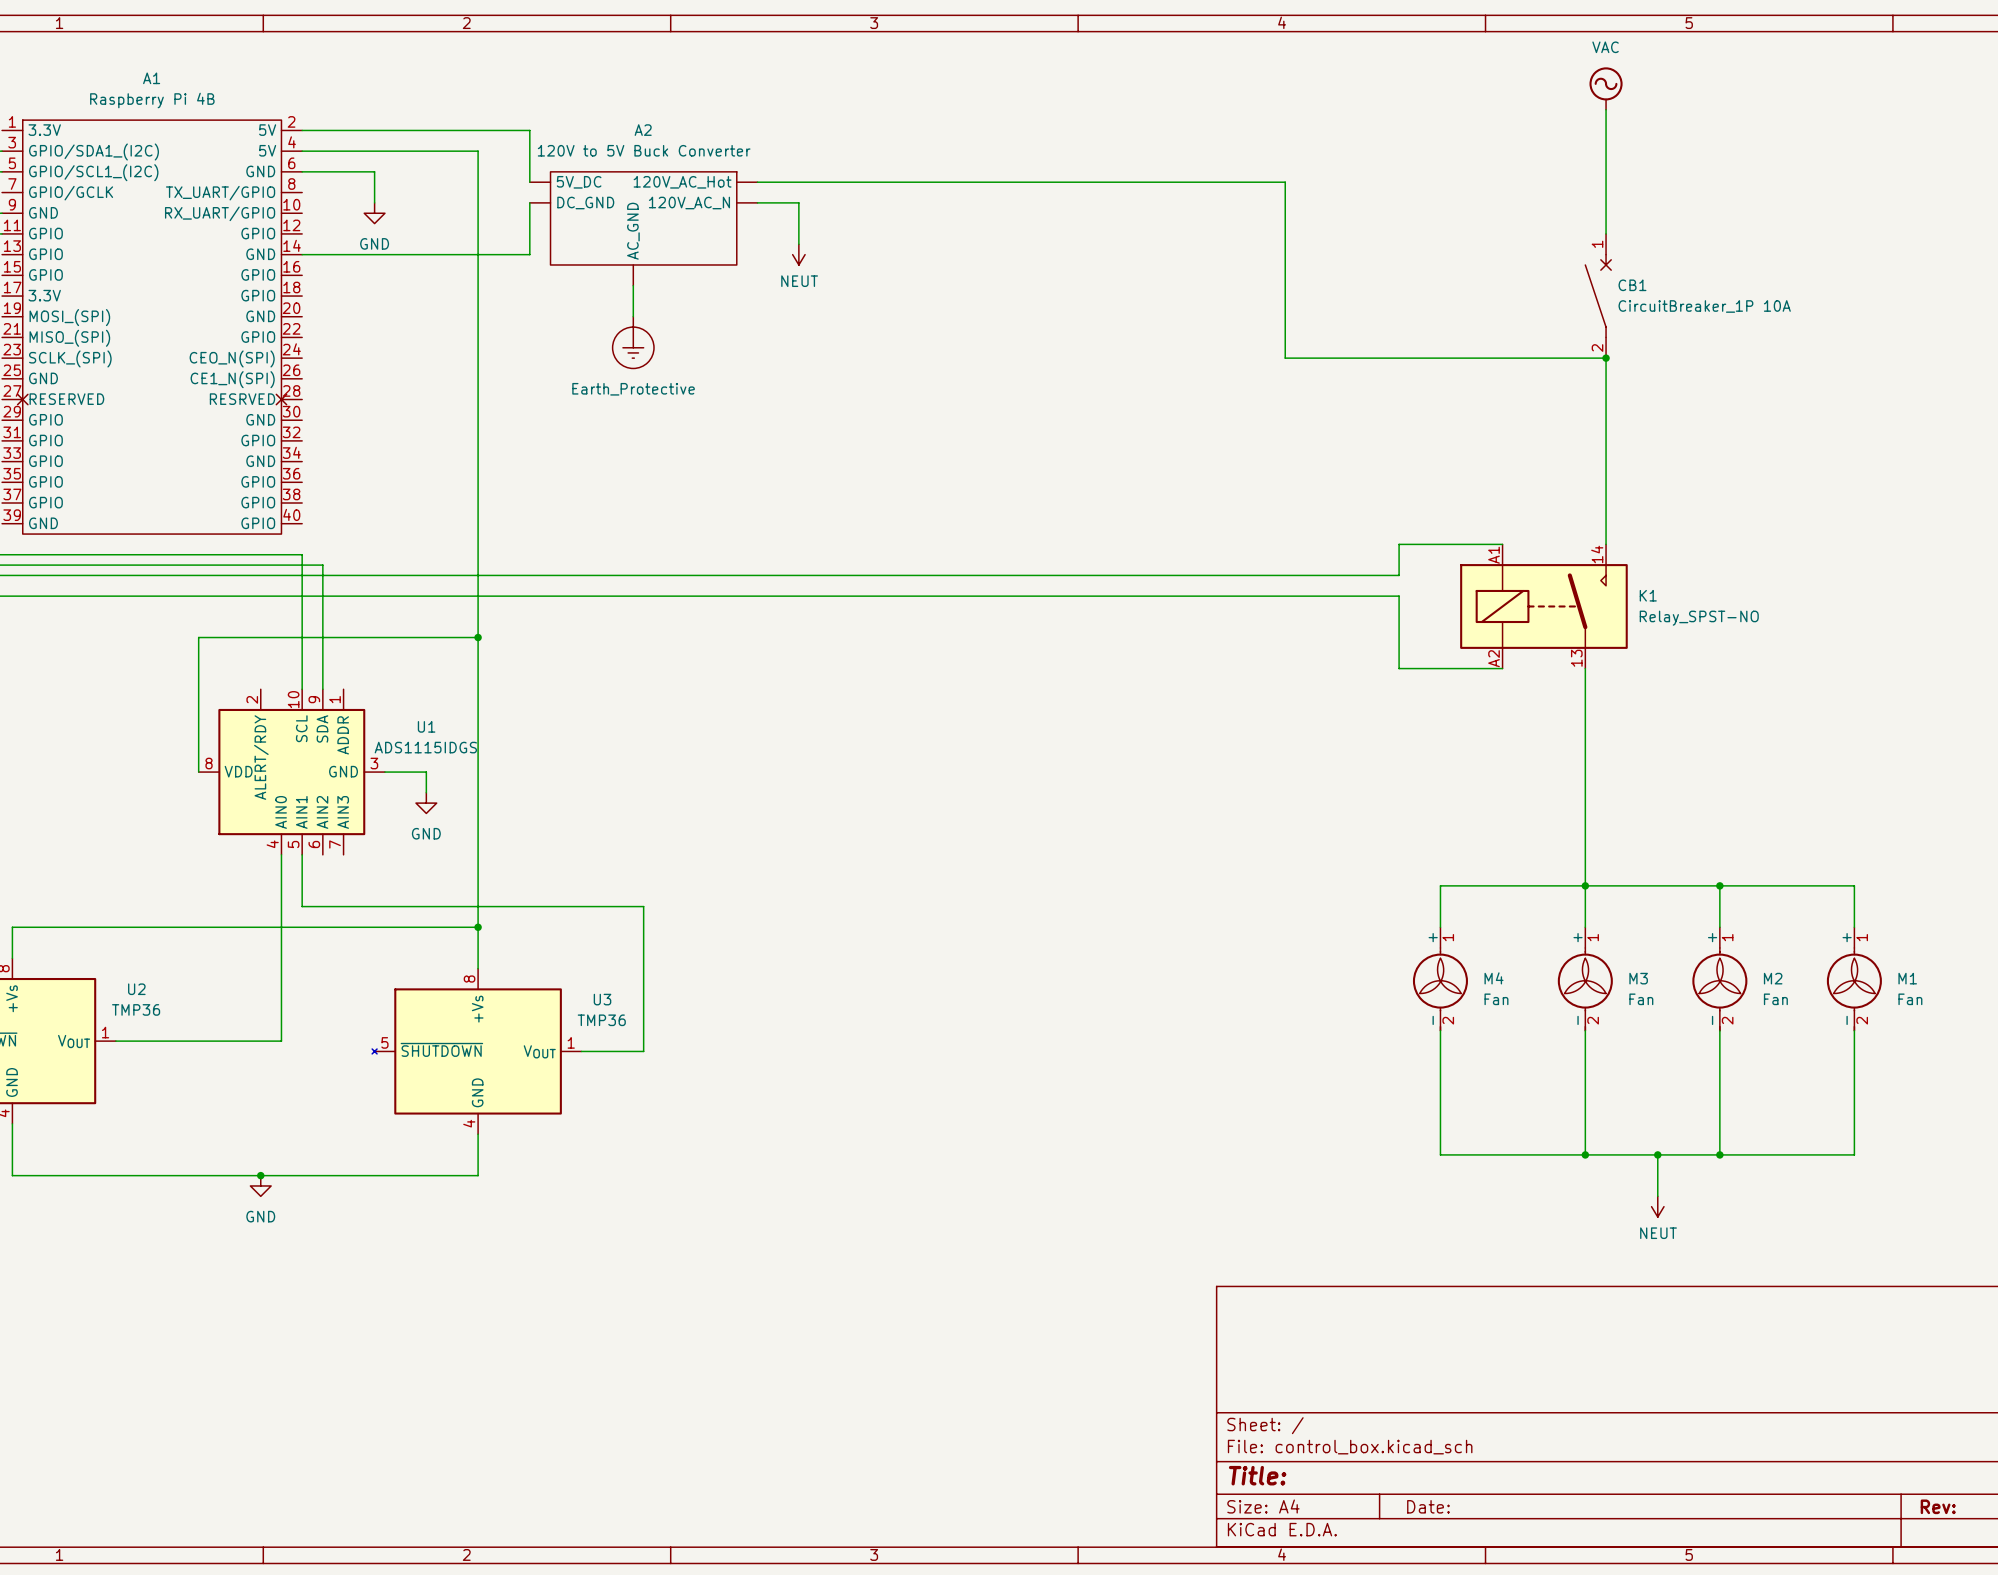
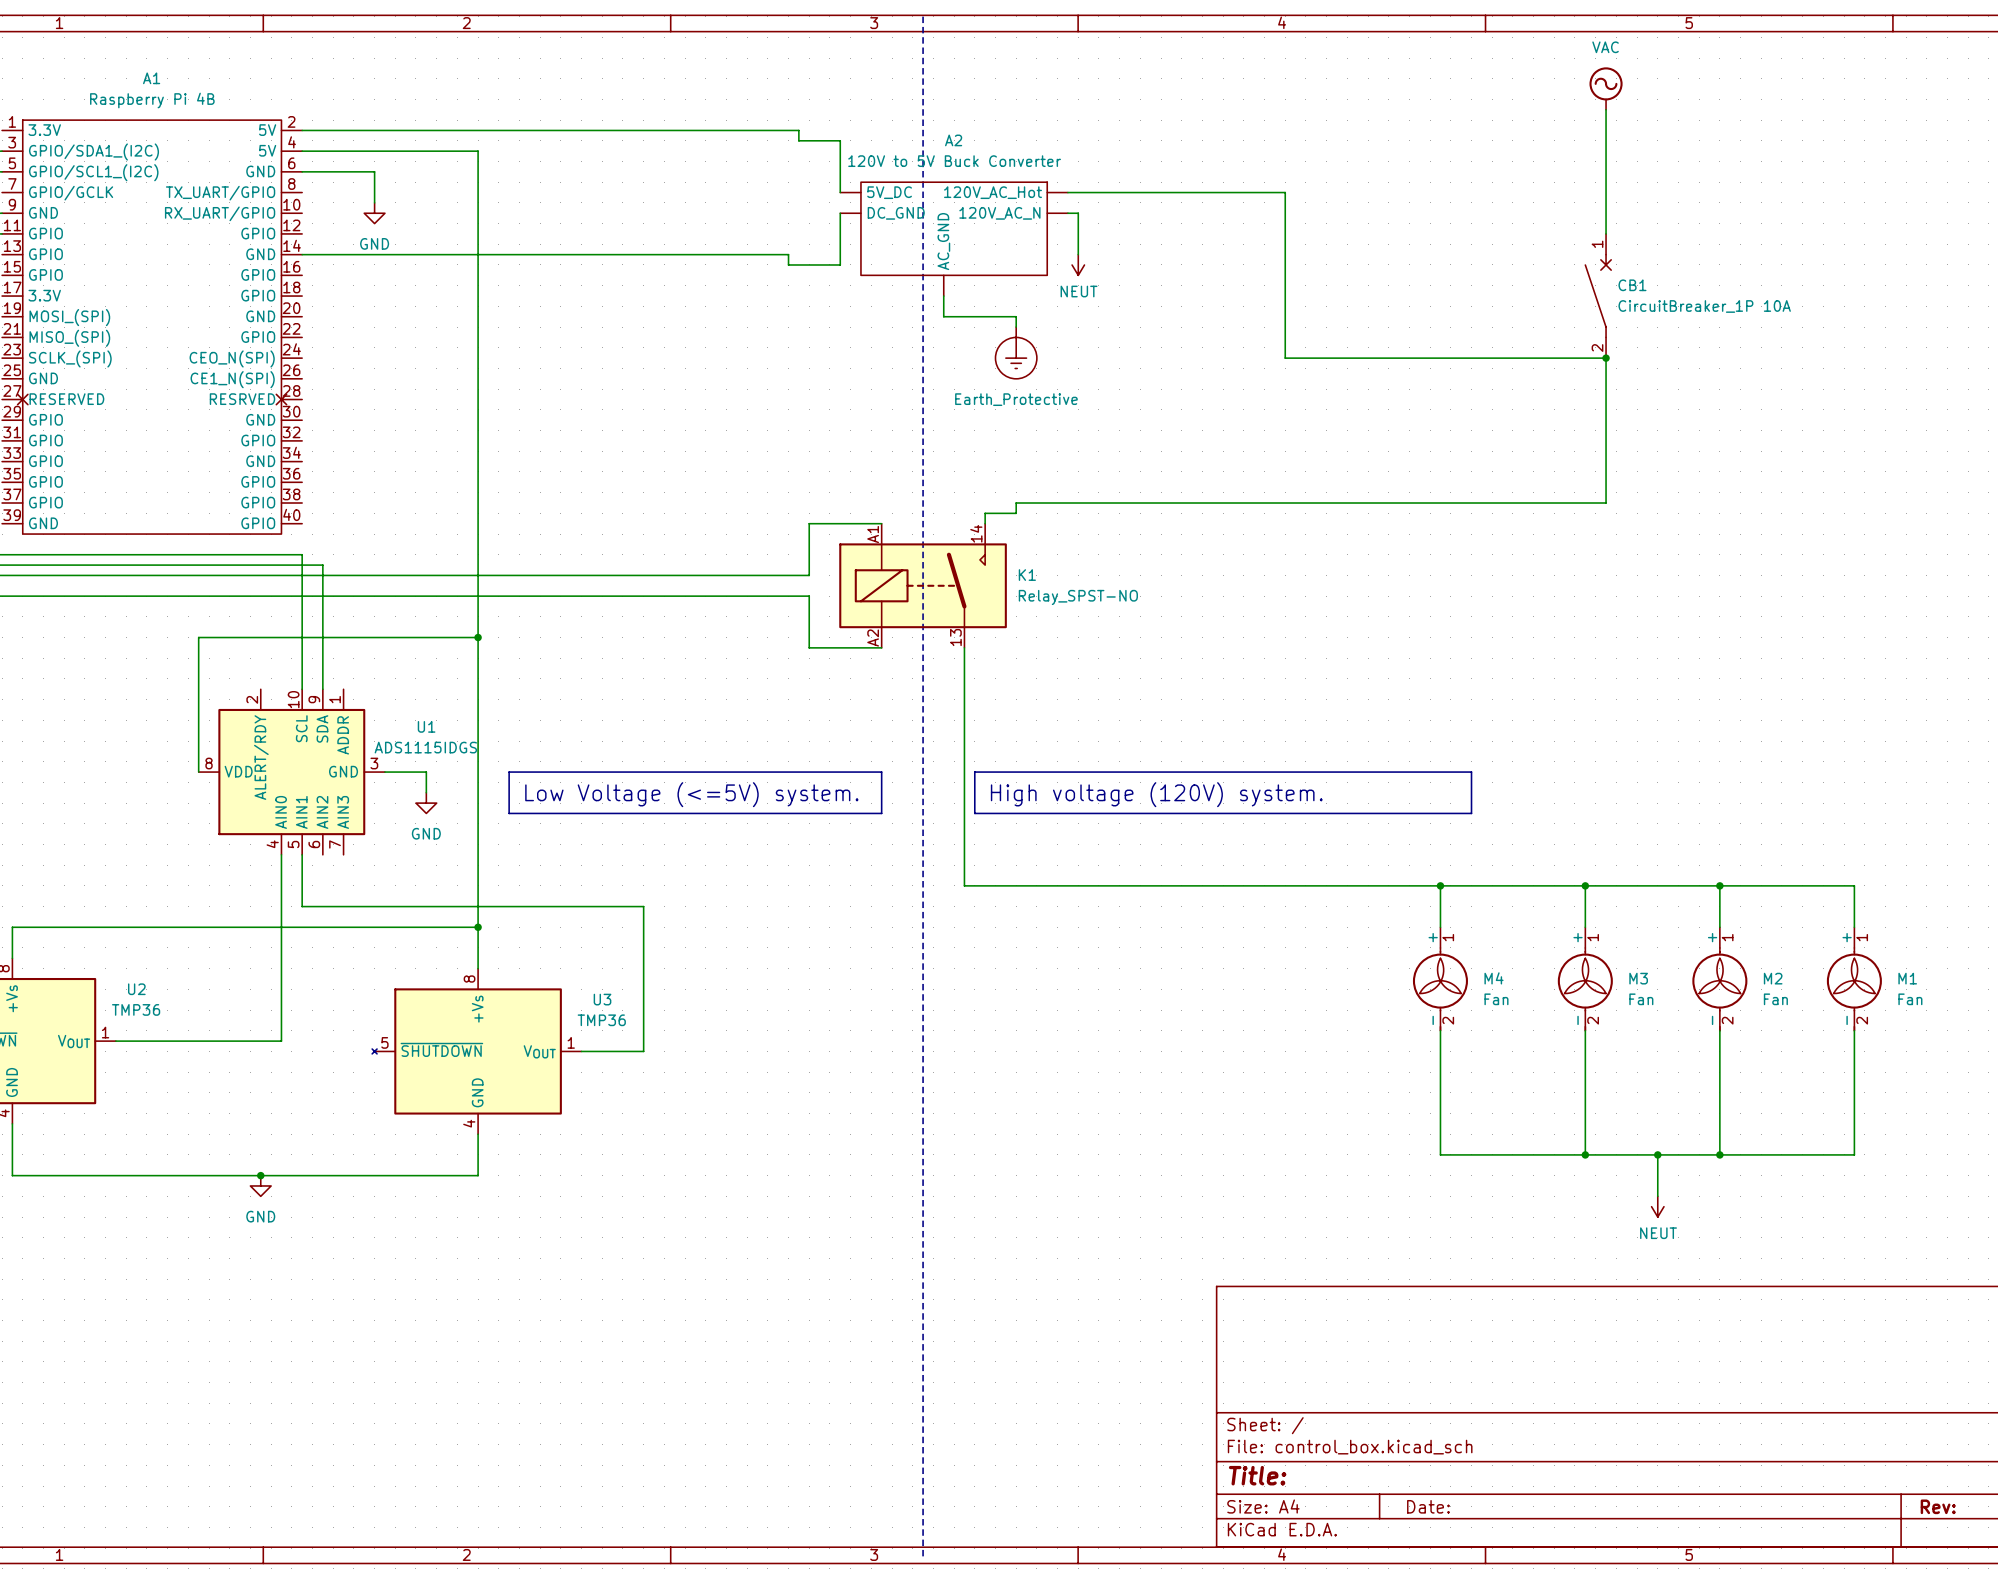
line: none -> (923, 16) (923, 1558)
wire: (529, 130) (529, 182) -> (529, 130) (798, 130) (798, 140) (840, 140) (840, 192)
wire: (757, 182) (1285, 182) (1285, 192) -> (1067, 192) (1285, 192)
wire: (529, 202) (529, 254) -> (840, 213) (840, 264) (788, 264) (788, 254) (529, 254)
wire: (757, 202) (798, 202) (798, 244) -> none
wire: none -> (1067, 213) (1078, 213) (1078, 254)
A2 position: (643, 228) -> (954, 239)
power symbol: NEUT (798, 254) -> none
power symbol: none -> NEUT (1078, 264)
wire: (633, 285) (633, 316) -> none
wire: none -> (943, 296) (943, 316) (1016, 316) (1016, 327)
power symbol: Earth_Protective (633, 342) -> none
power symbol: none -> Earth_Protective (1016, 352)
wire: (1606, 503) (1606, 544) -> (1606, 503) (1016, 503) (1016, 513) (985, 513) (985, 523)
wire: (1502, 544) (1399, 544) (1399, 575) (809, 575) -> (881, 523) (809, 523) (809, 575)
wire: (809, 596) (1399, 596) (1399, 668) (1502, 668) -> (809, 596) (809, 647) (881, 647)
K1 position: (1543, 606) -> (923, 585)
wire: none -> (964, 647) (964, 885) (1440, 885)
wire: (1585, 668) (1585, 885) -> none
line: none -> (509, 772) (881, 772) (881, 813) (509, 813) (509, 772)
line: none -> (974, 772) (1471, 772) (1471, 813) (974, 813) (974, 772)
text: none -> Low Voltage (<=5V) system. (691, 794)
text: none -> High voltage (120V) system. (1156, 794)
junction: none -> (1440, 885)

